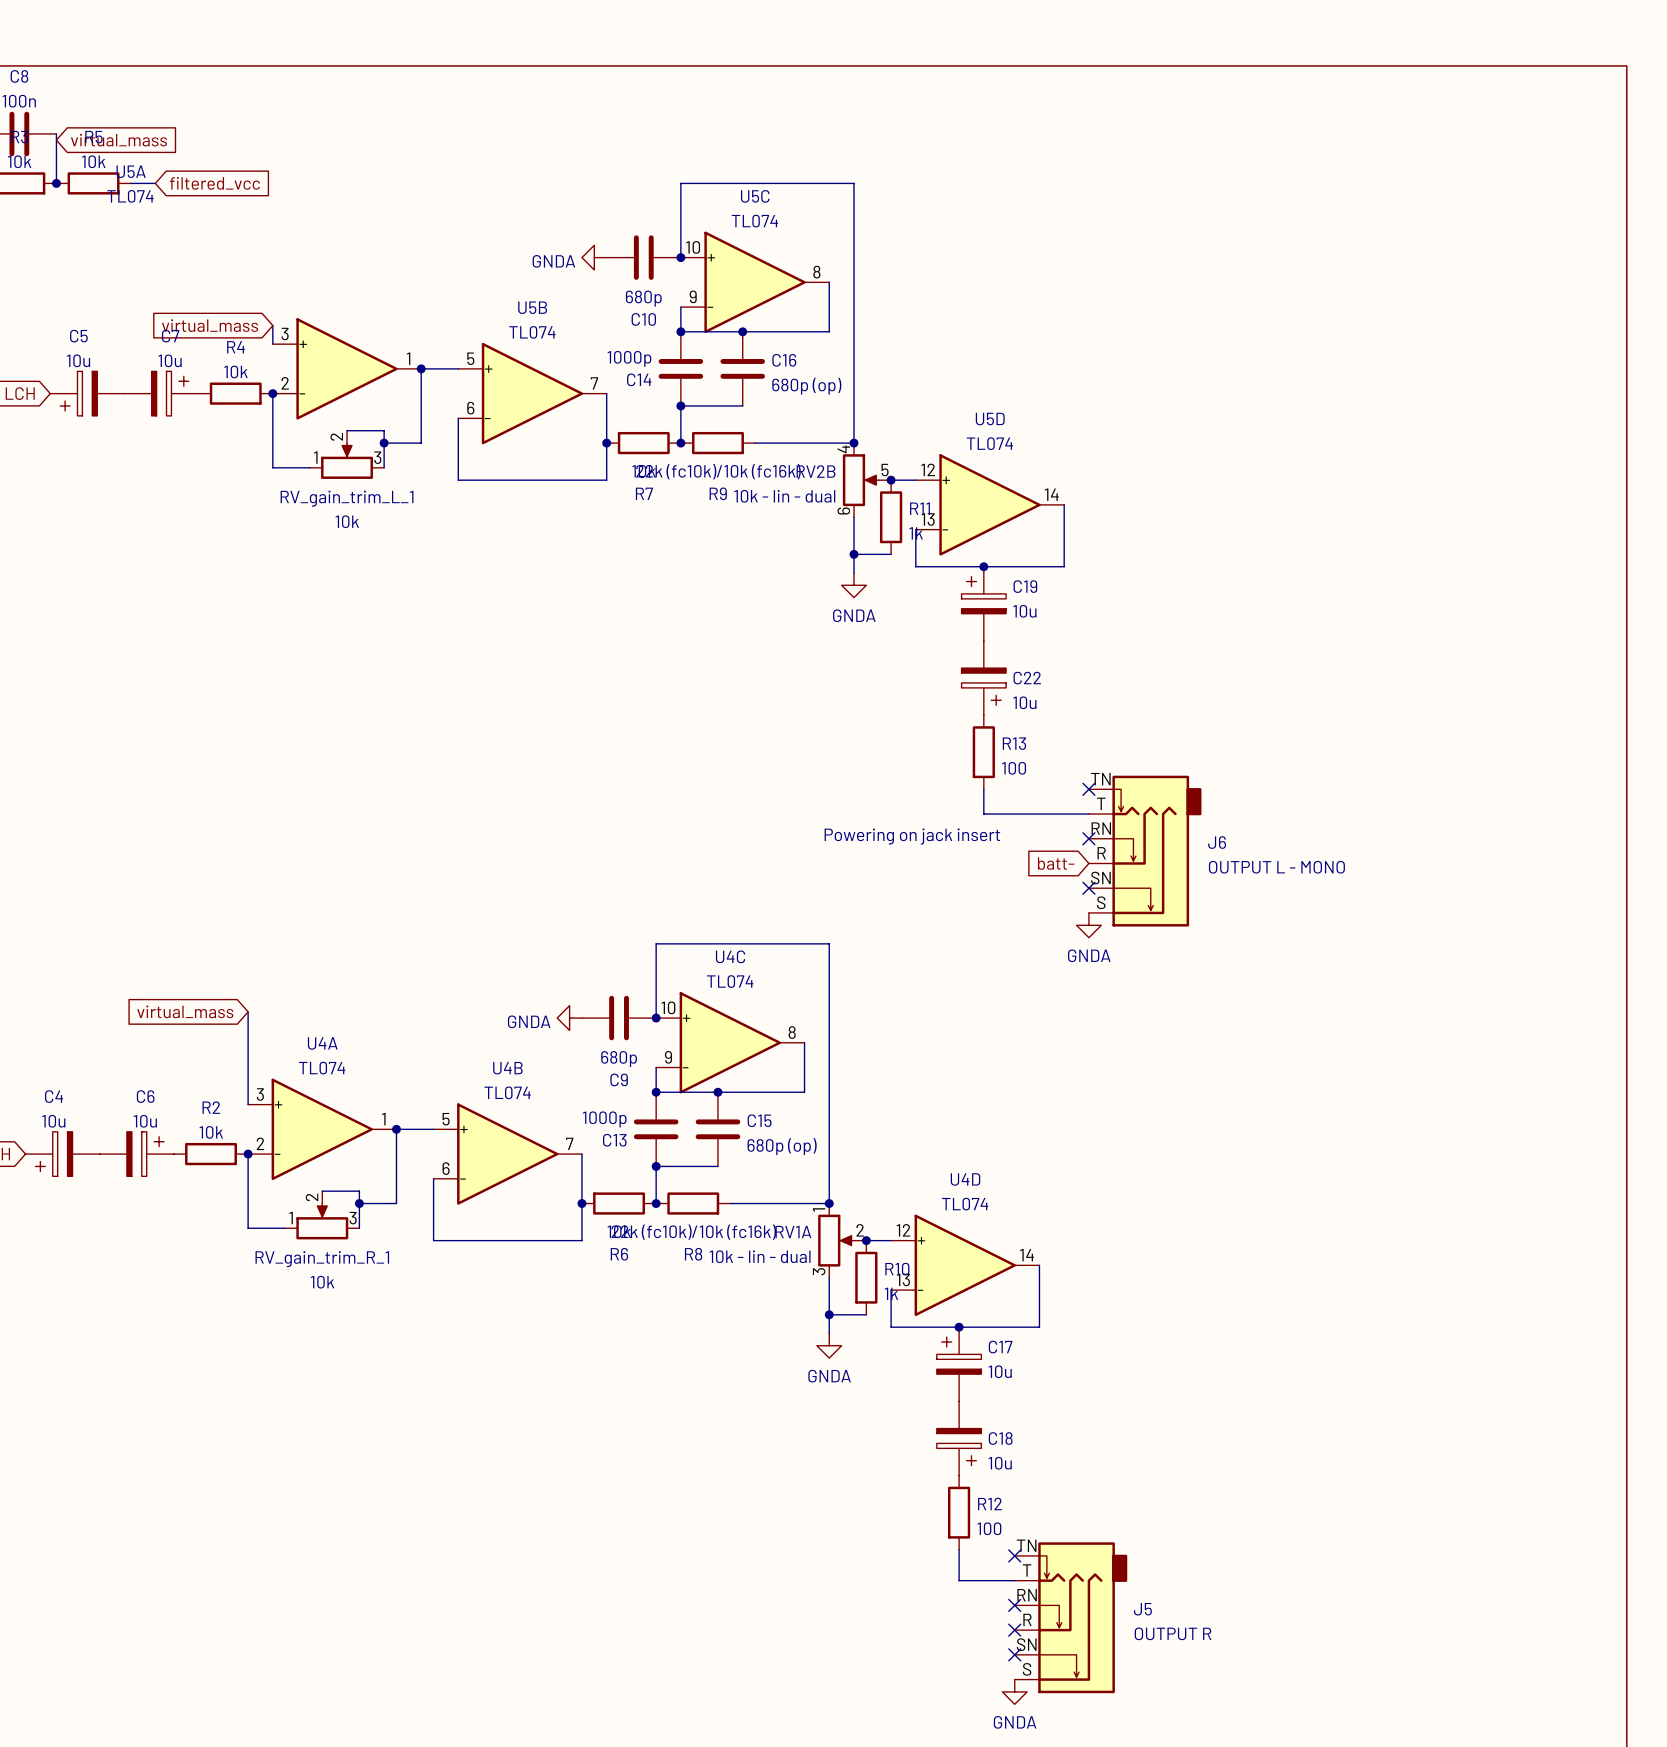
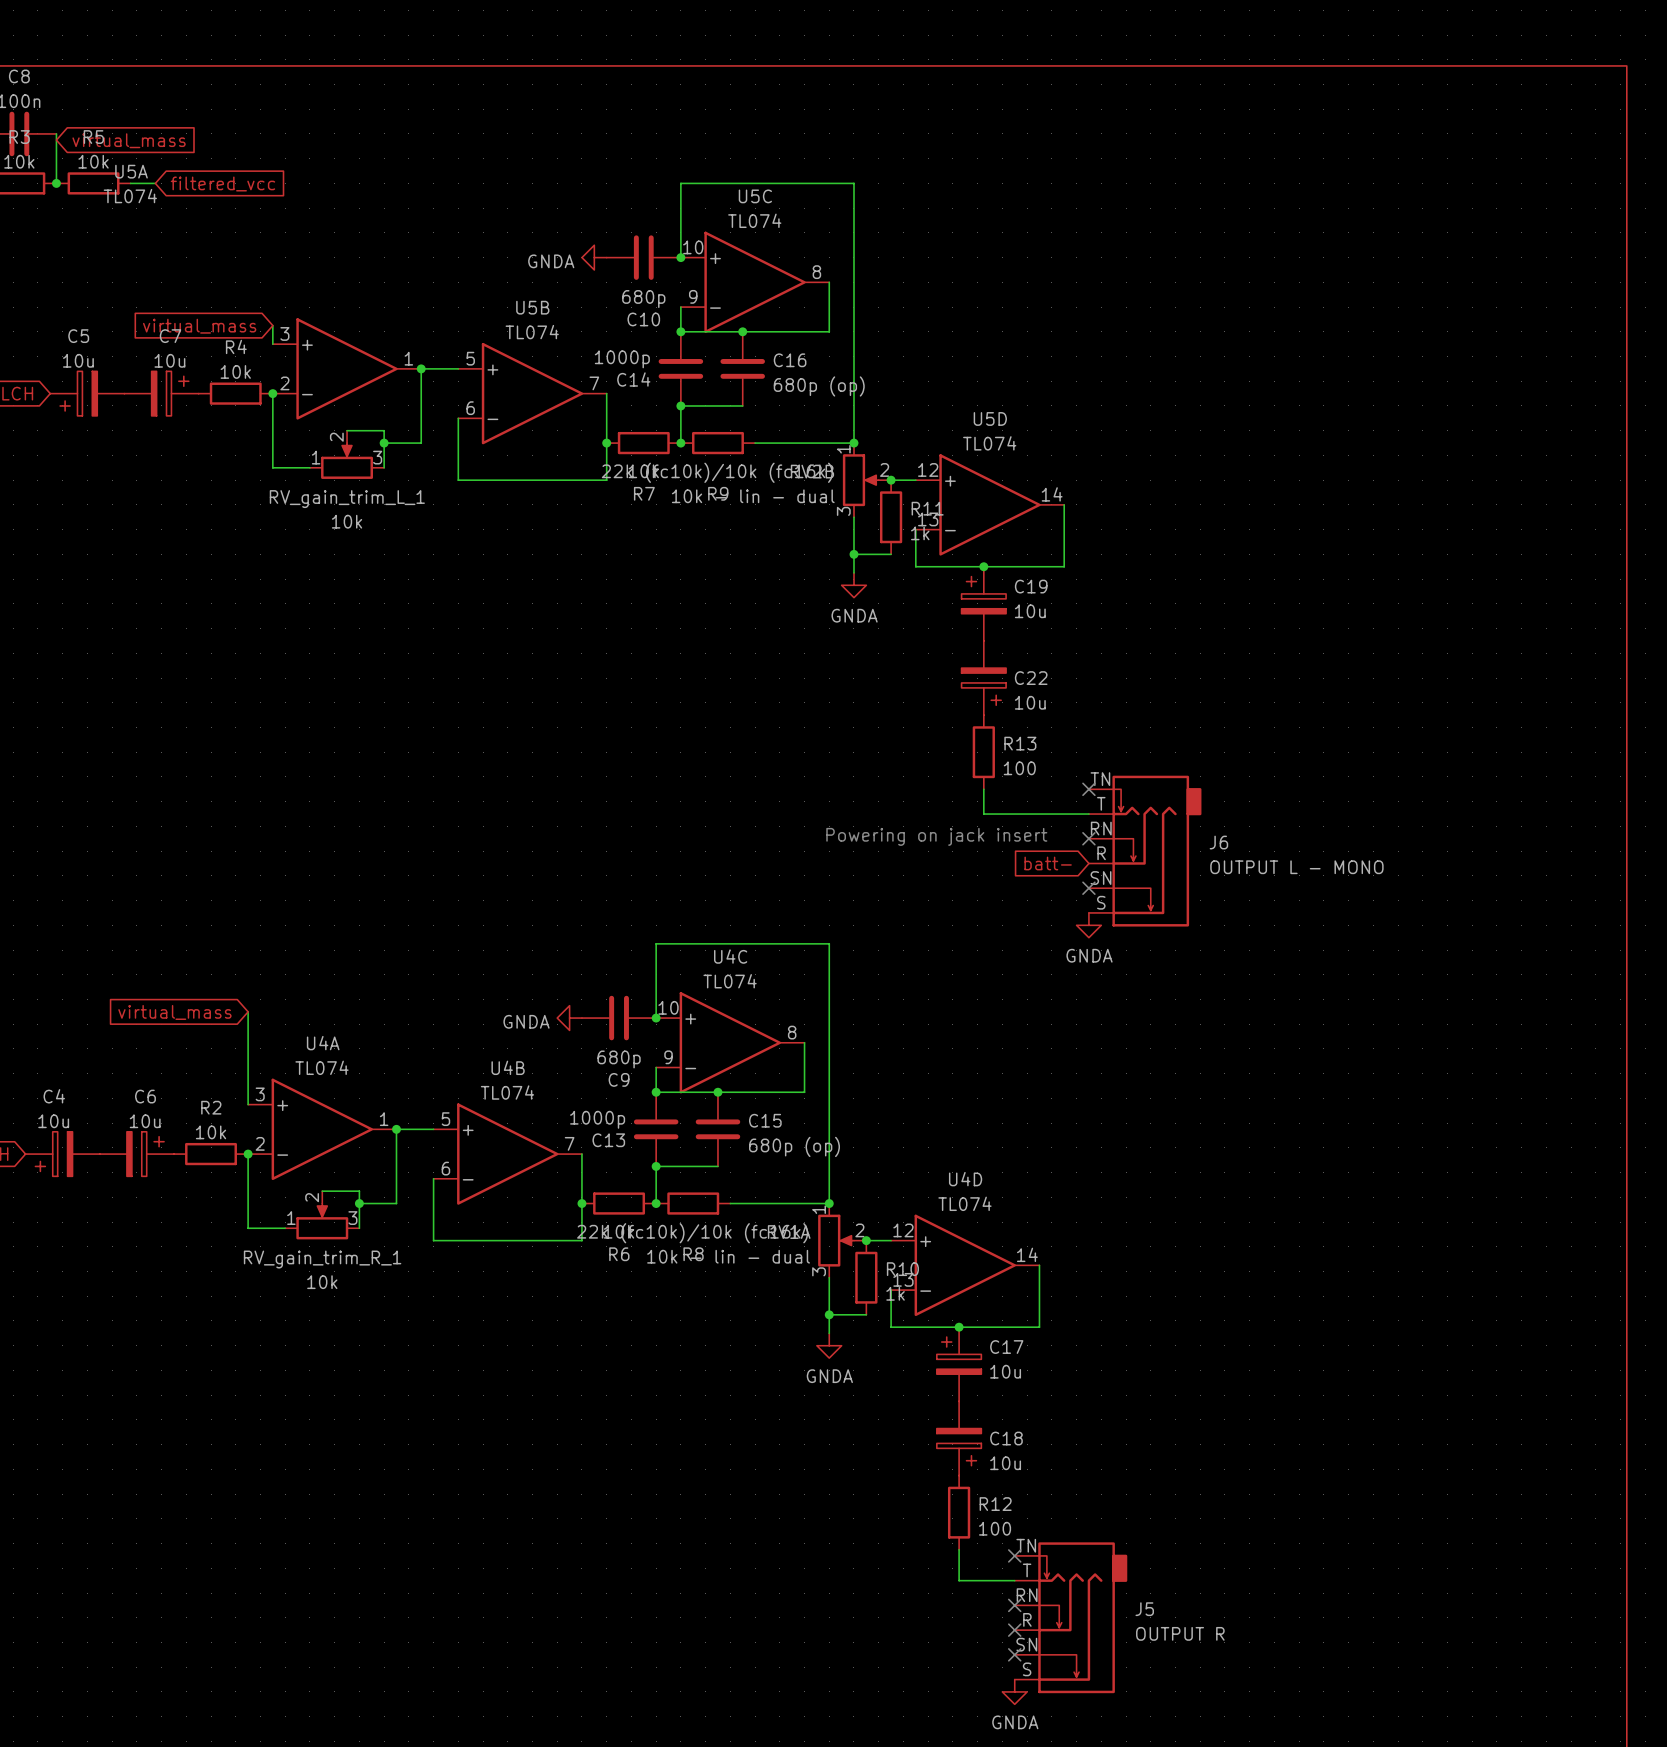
RV2B pin number: 4 (843, 449) -> 1 (843, 449)
RV2B pin number: 5 (885, 470) -> 2 (884, 469)
RV2B pin number: 6 (843, 510) -> 3 (843, 511)

